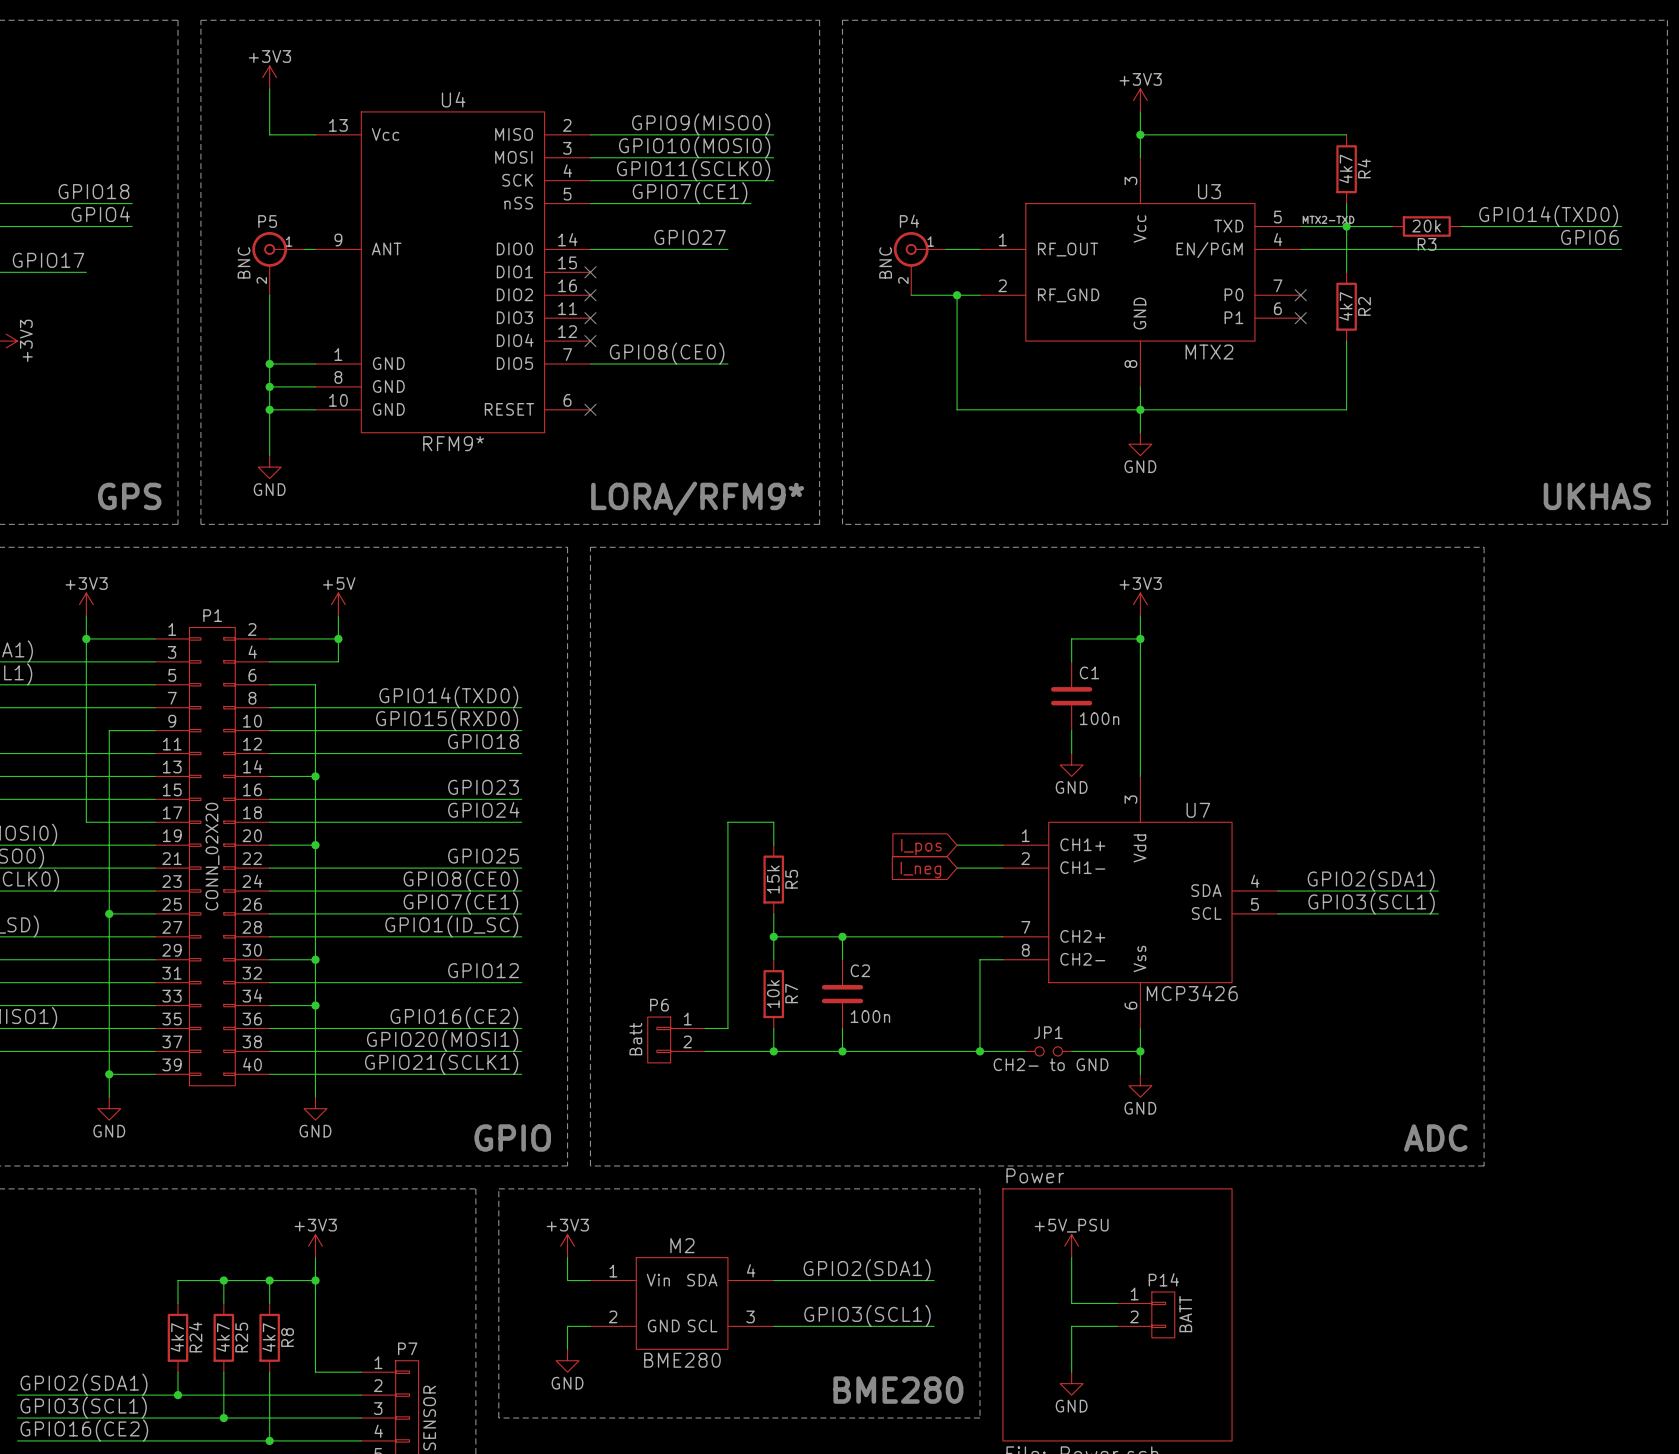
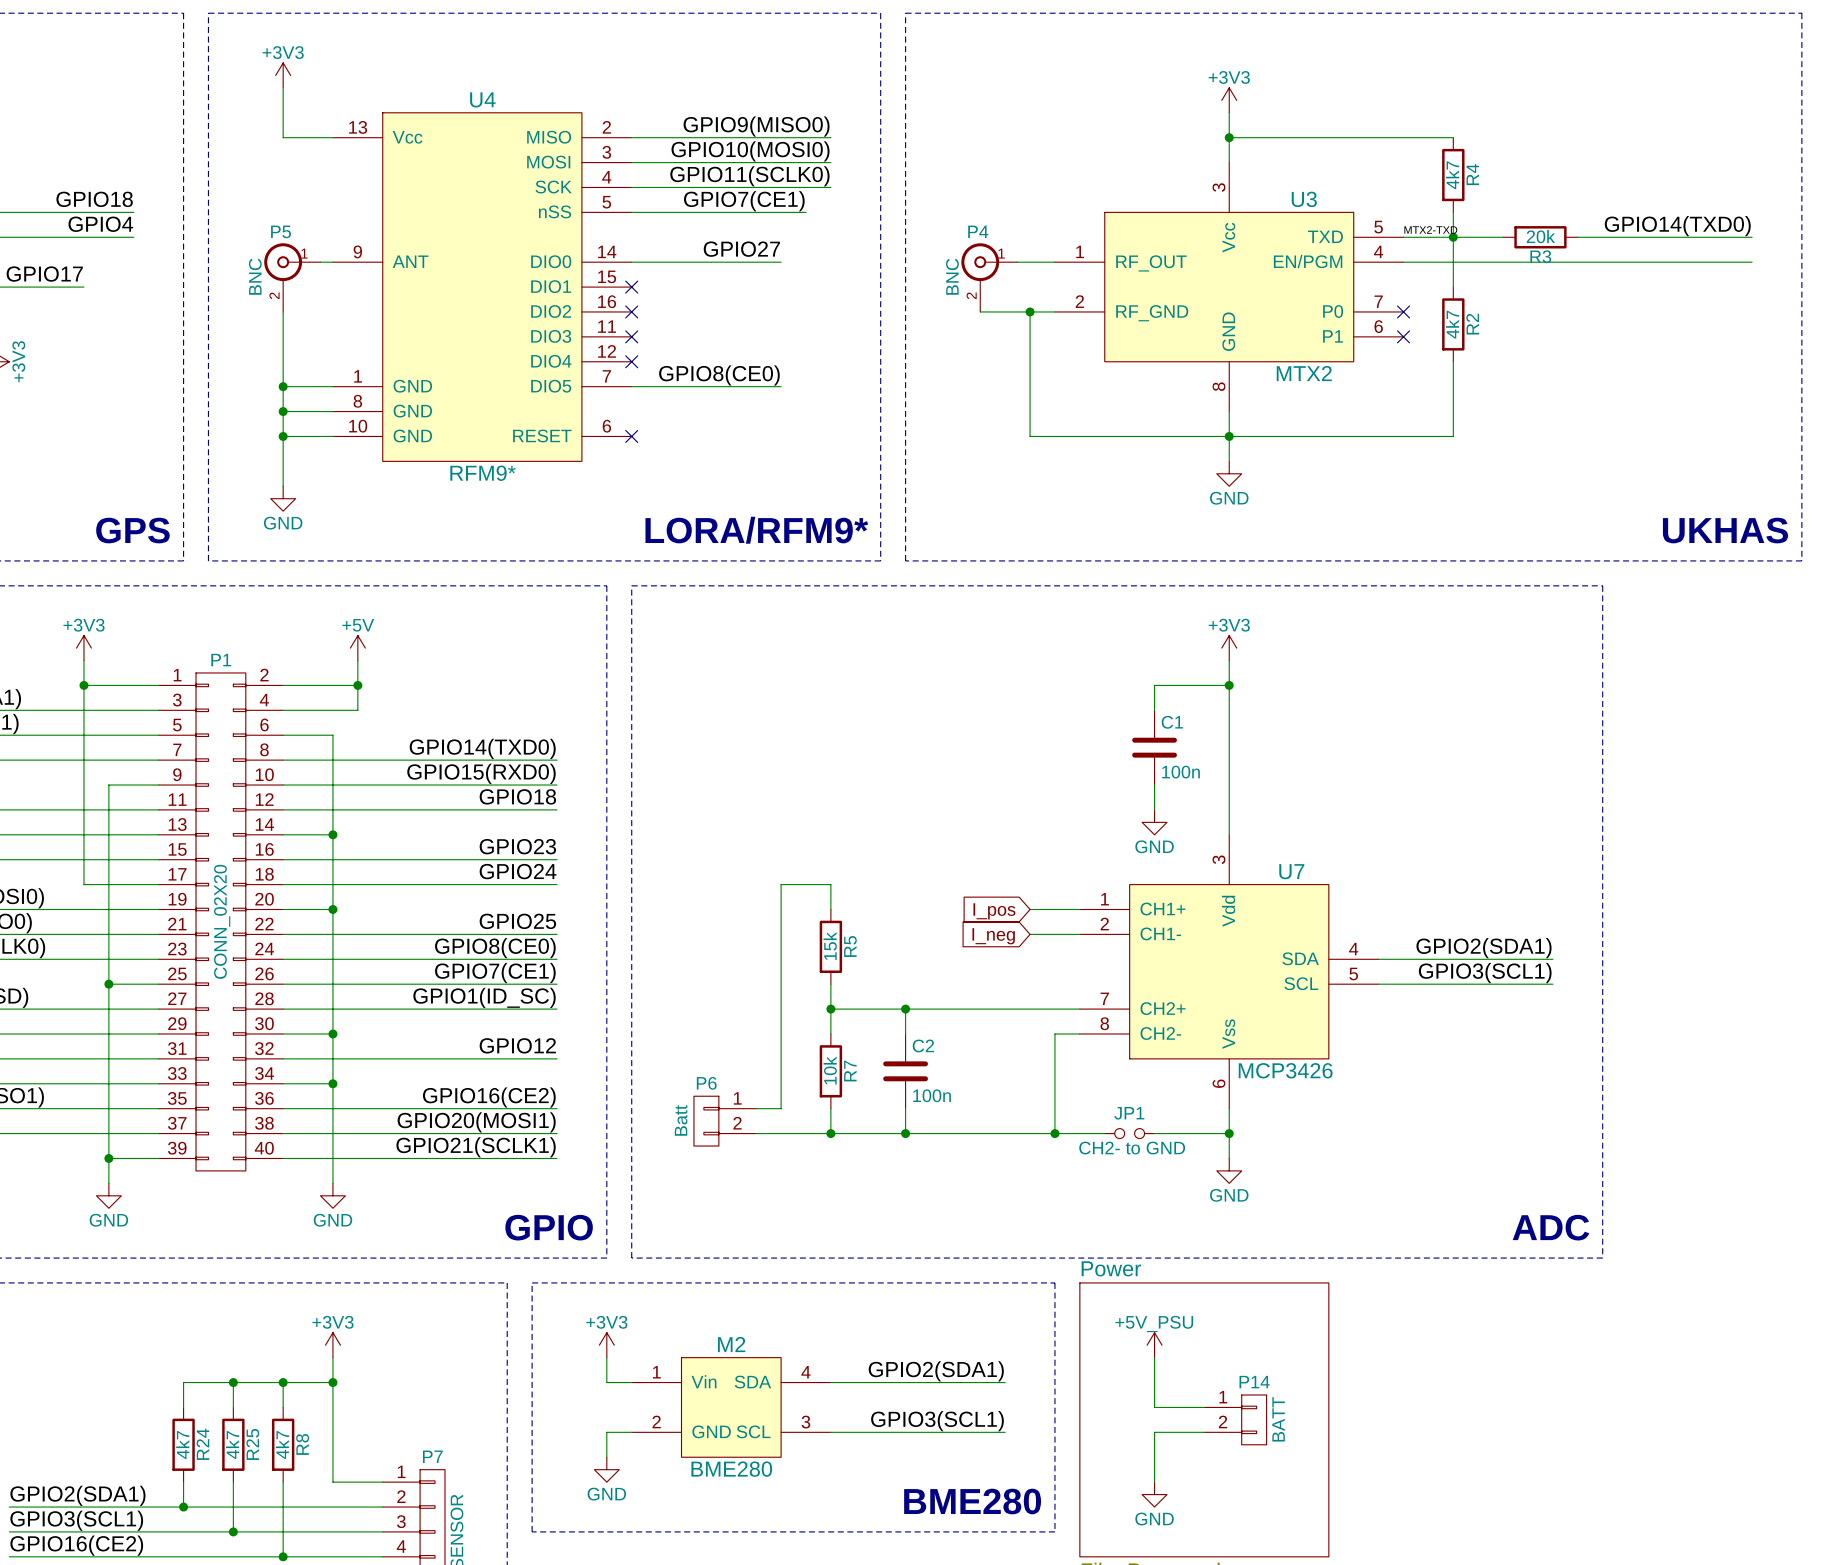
label: GPIO6 (1589, 237) -> none

